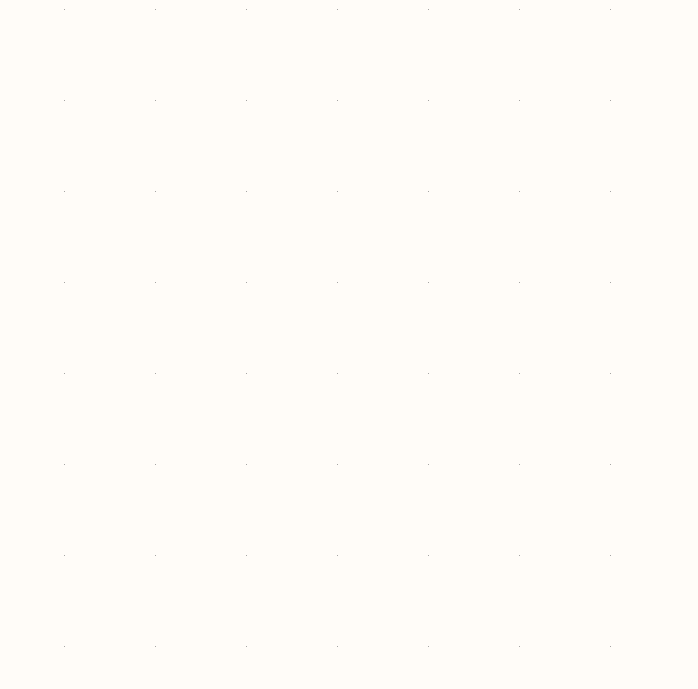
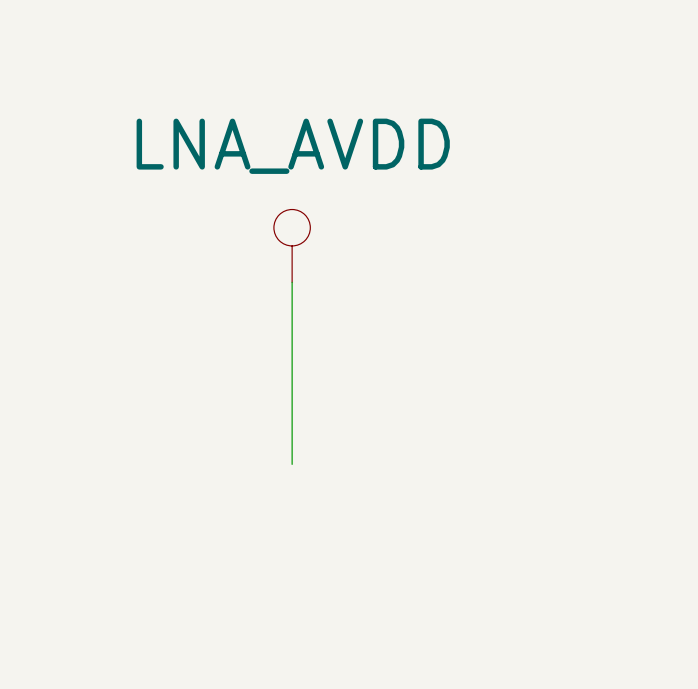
power symbol: none -> LNA_AVDD (292, 245)
wire: none -> (292, 282) (292, 464)

